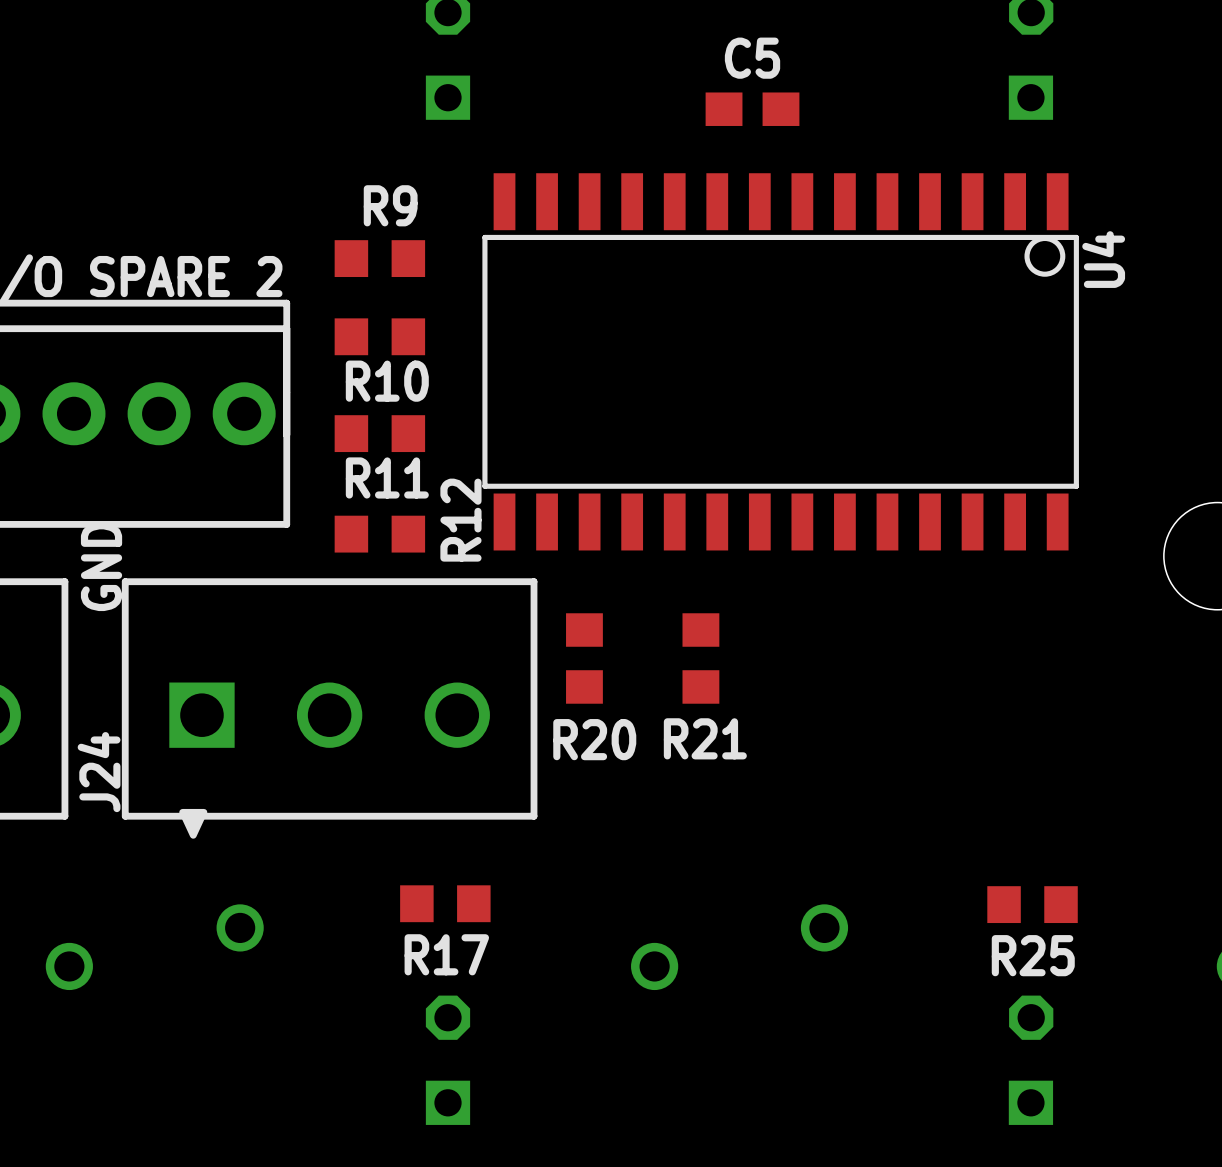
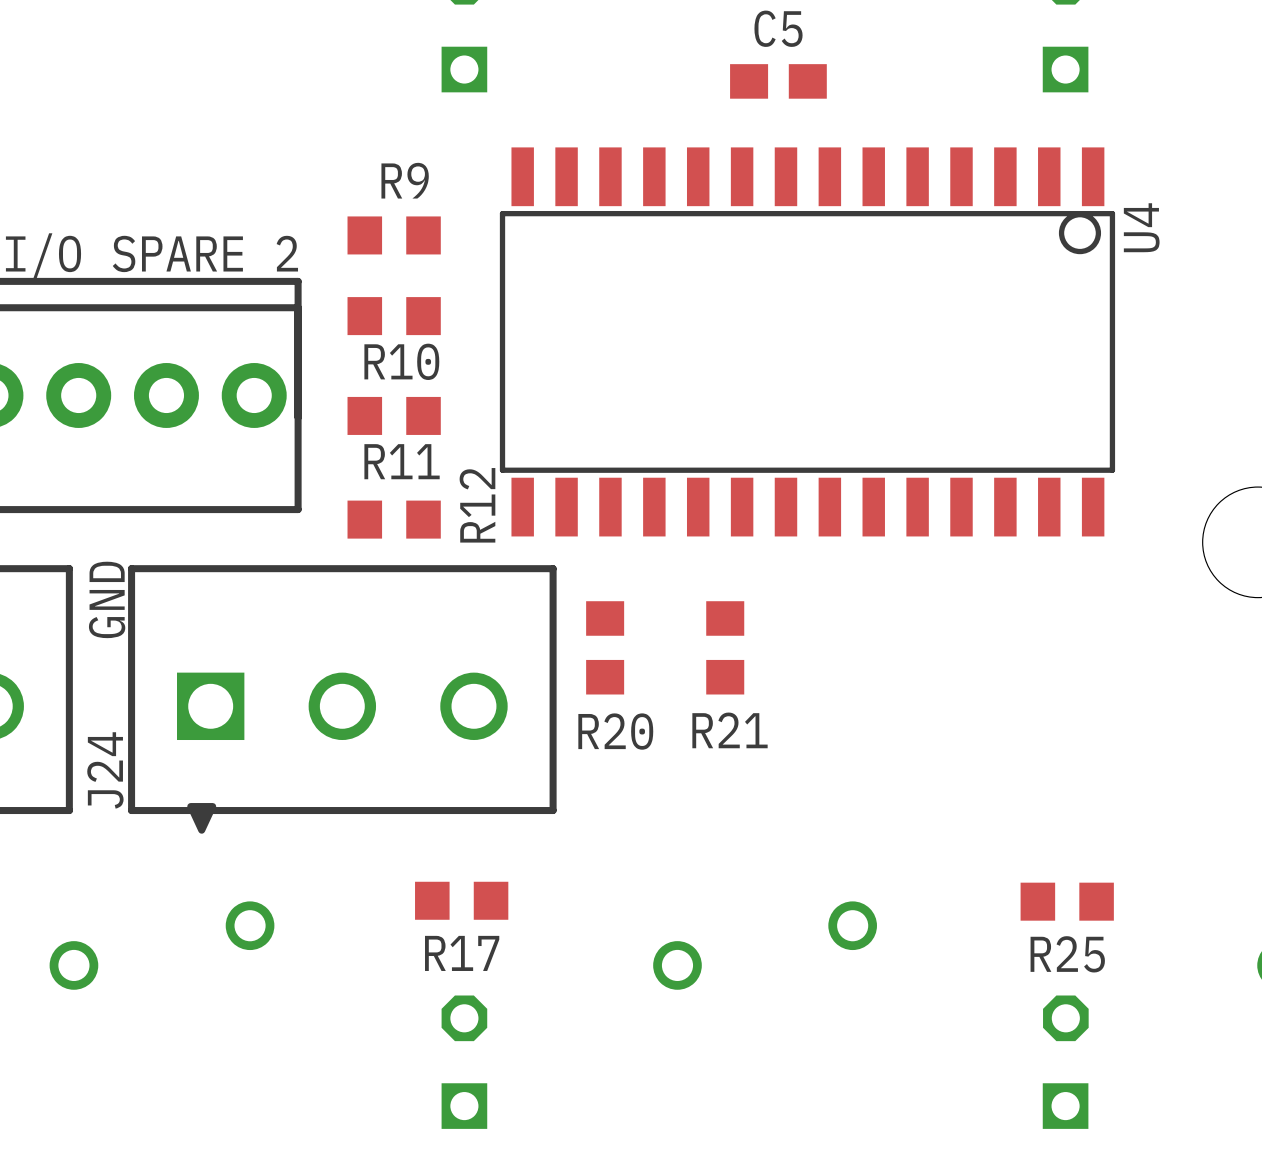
text position: GND (101, 566) -> GND (107, 599)

